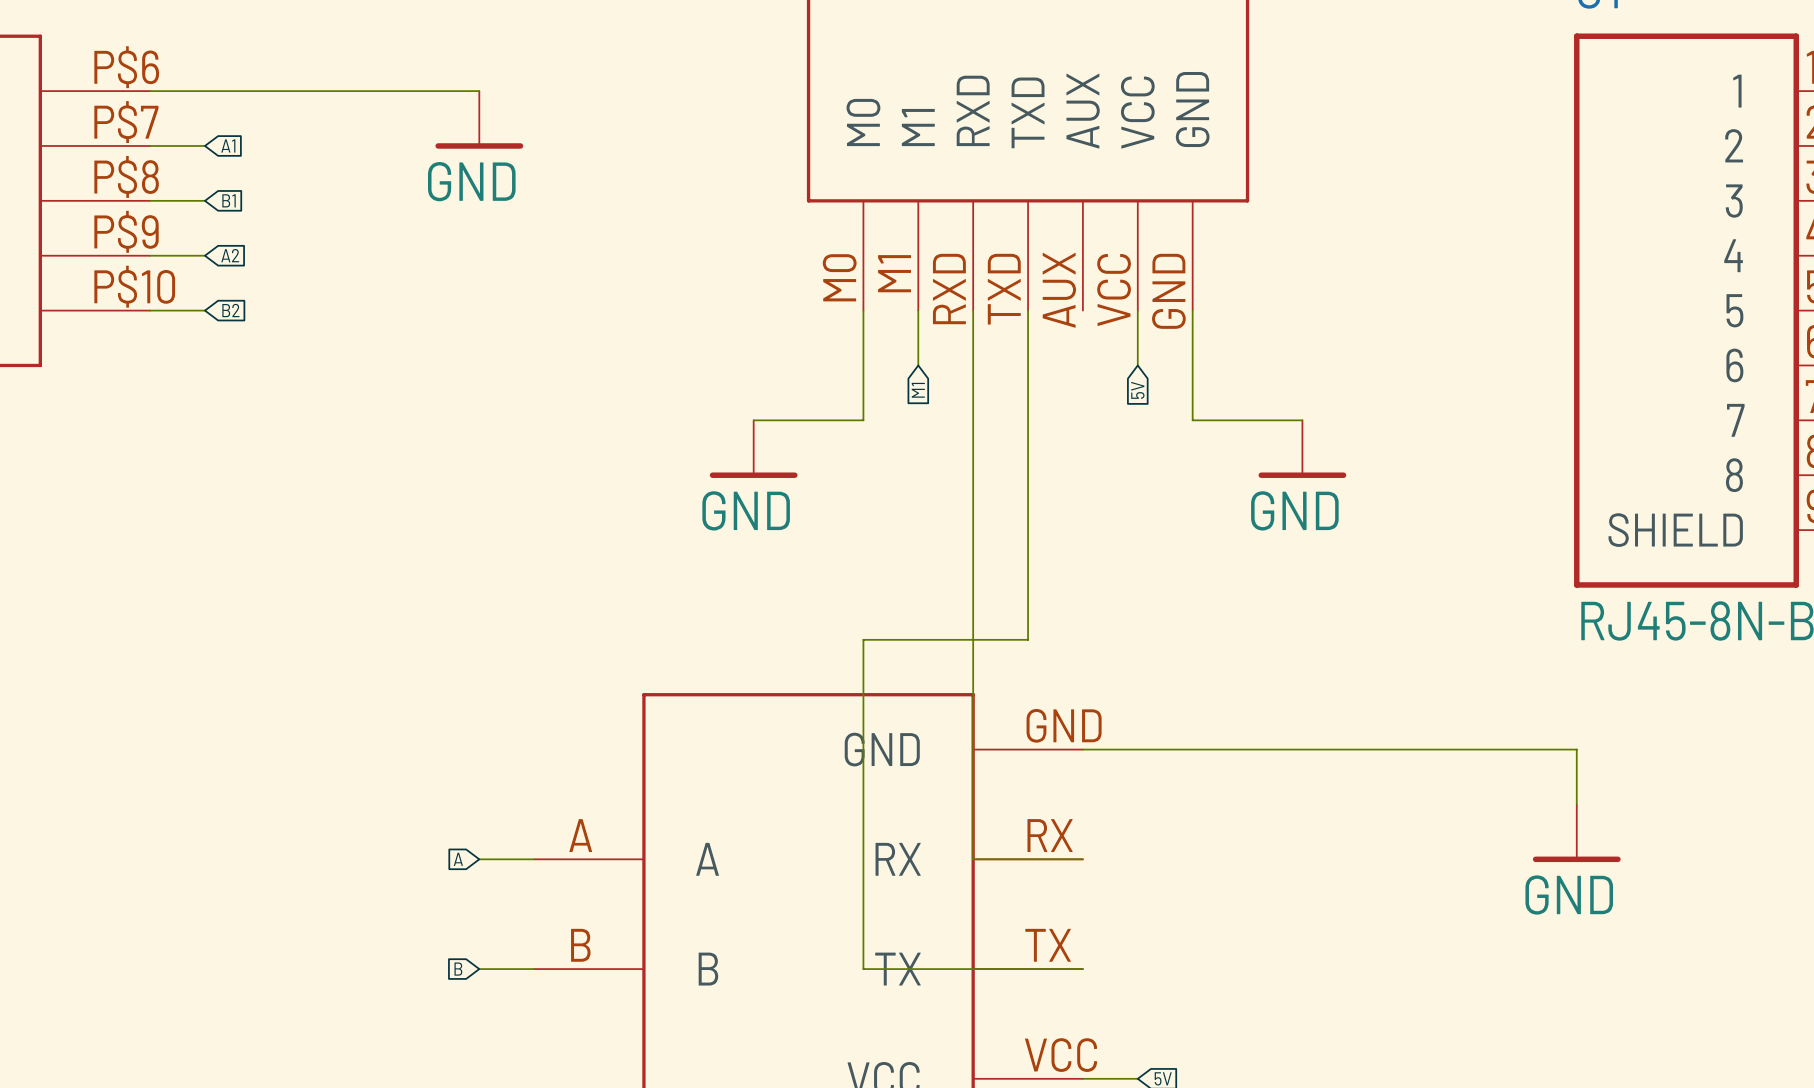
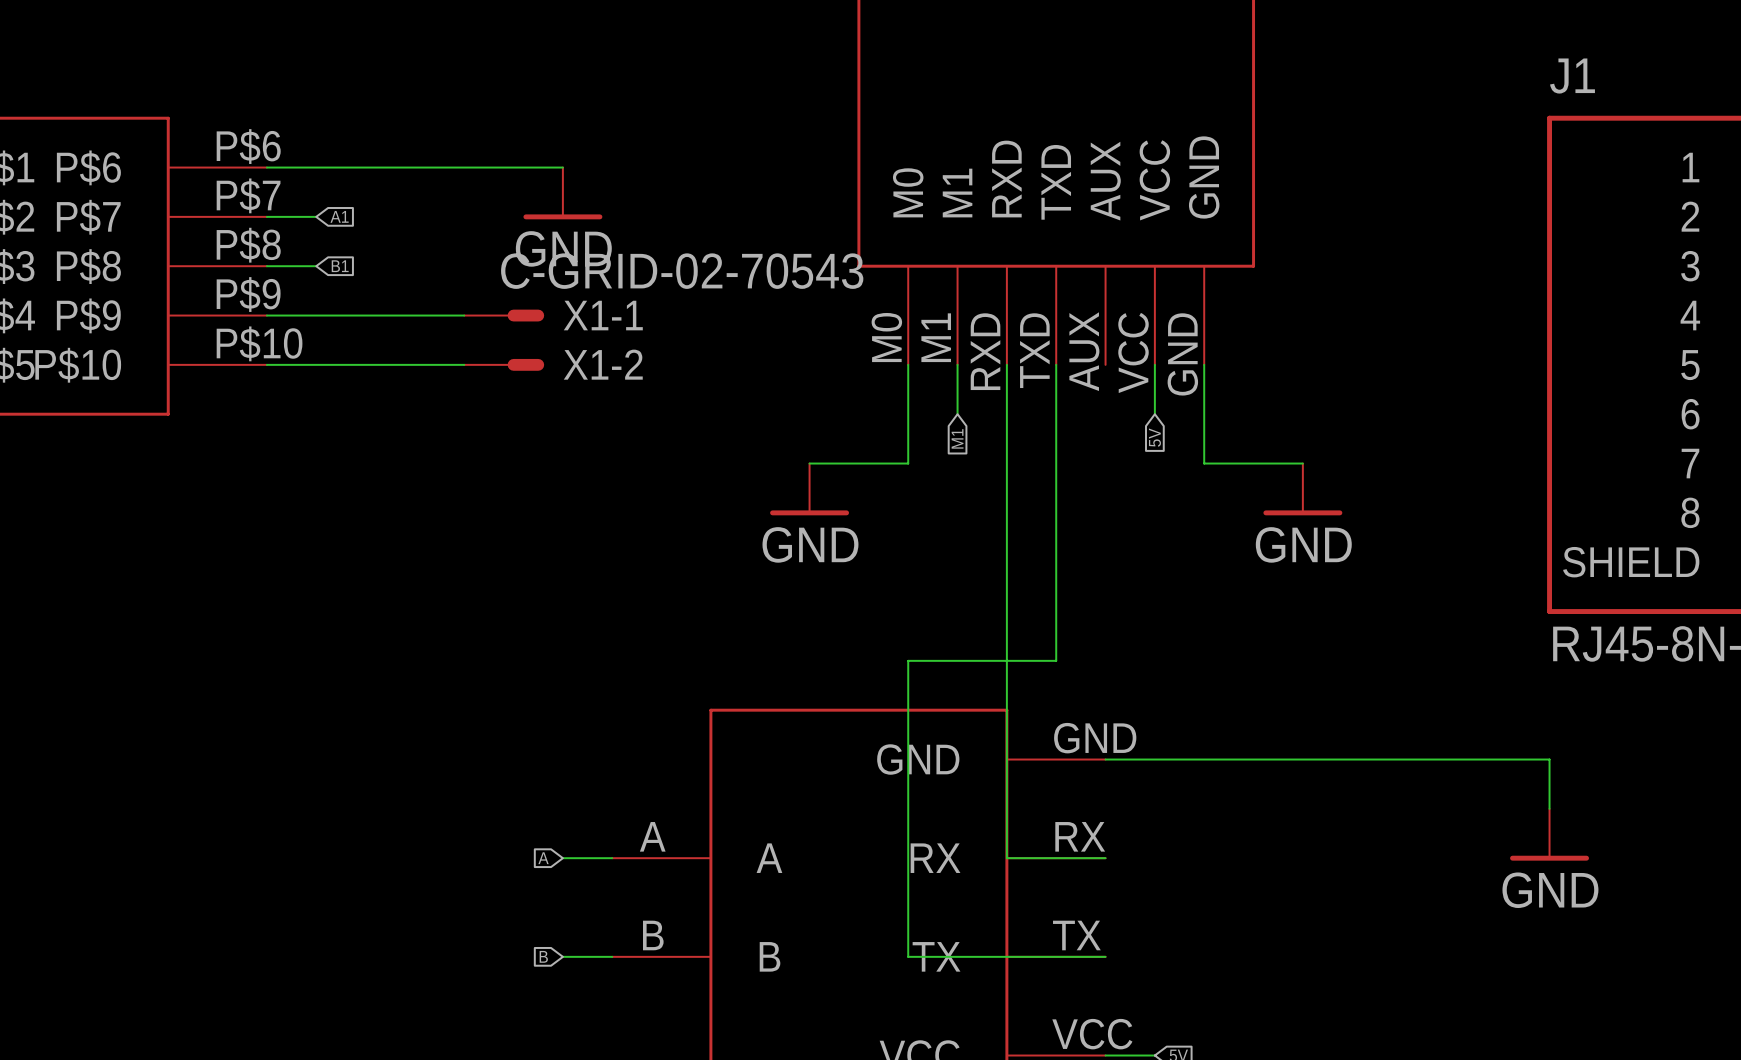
wire: none -> (316, 315) (464, 315)
global label: A2 (230, 255) -> none
X1-1: none -> C-GRID-02-70543 (504, 315)
wire: none -> (316, 364) (464, 364)
global label: B2 (230, 310) -> none
X1-2: none -> (504, 364)

